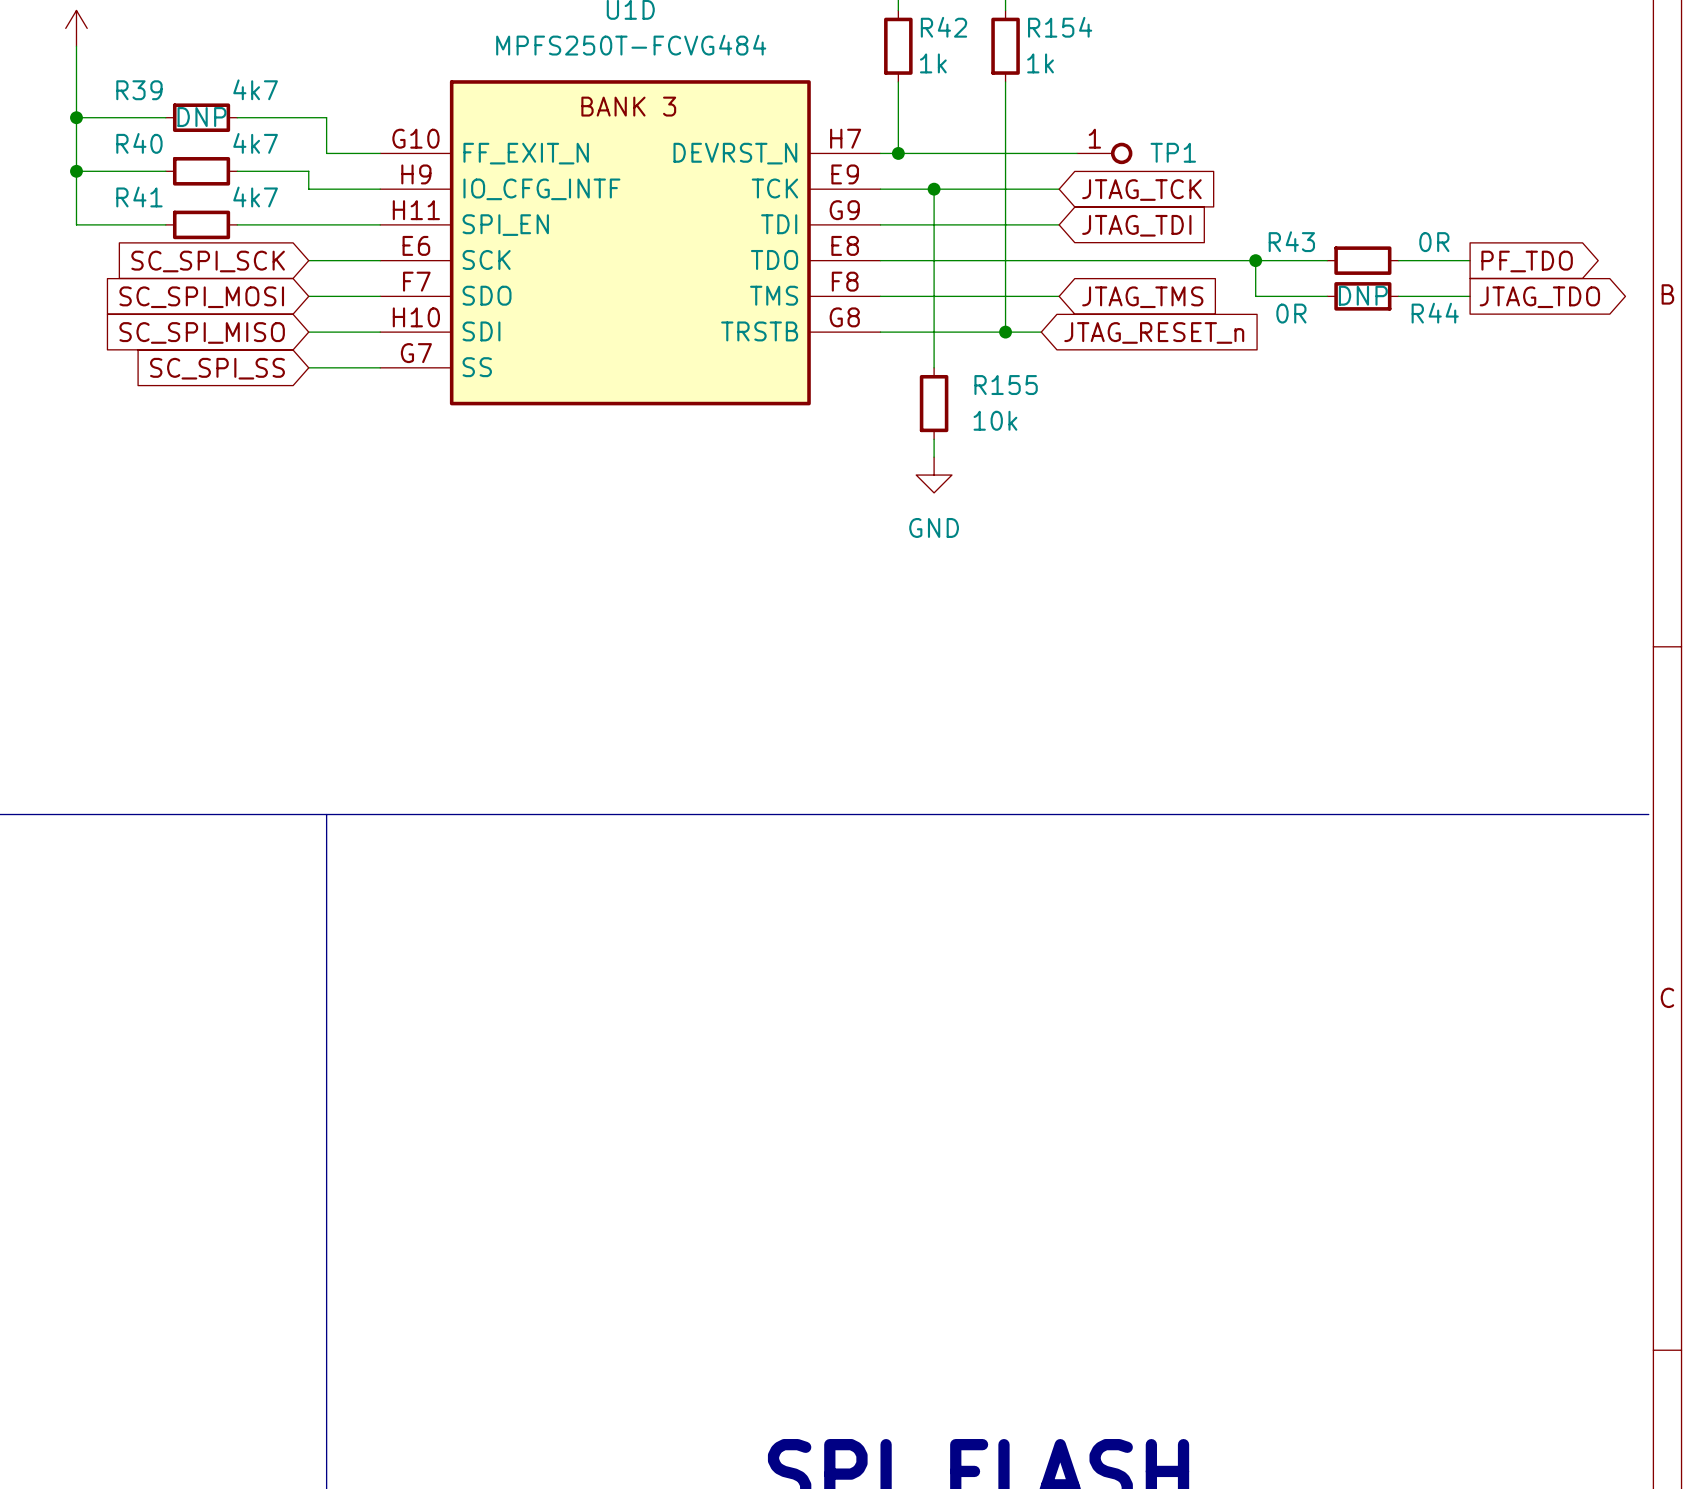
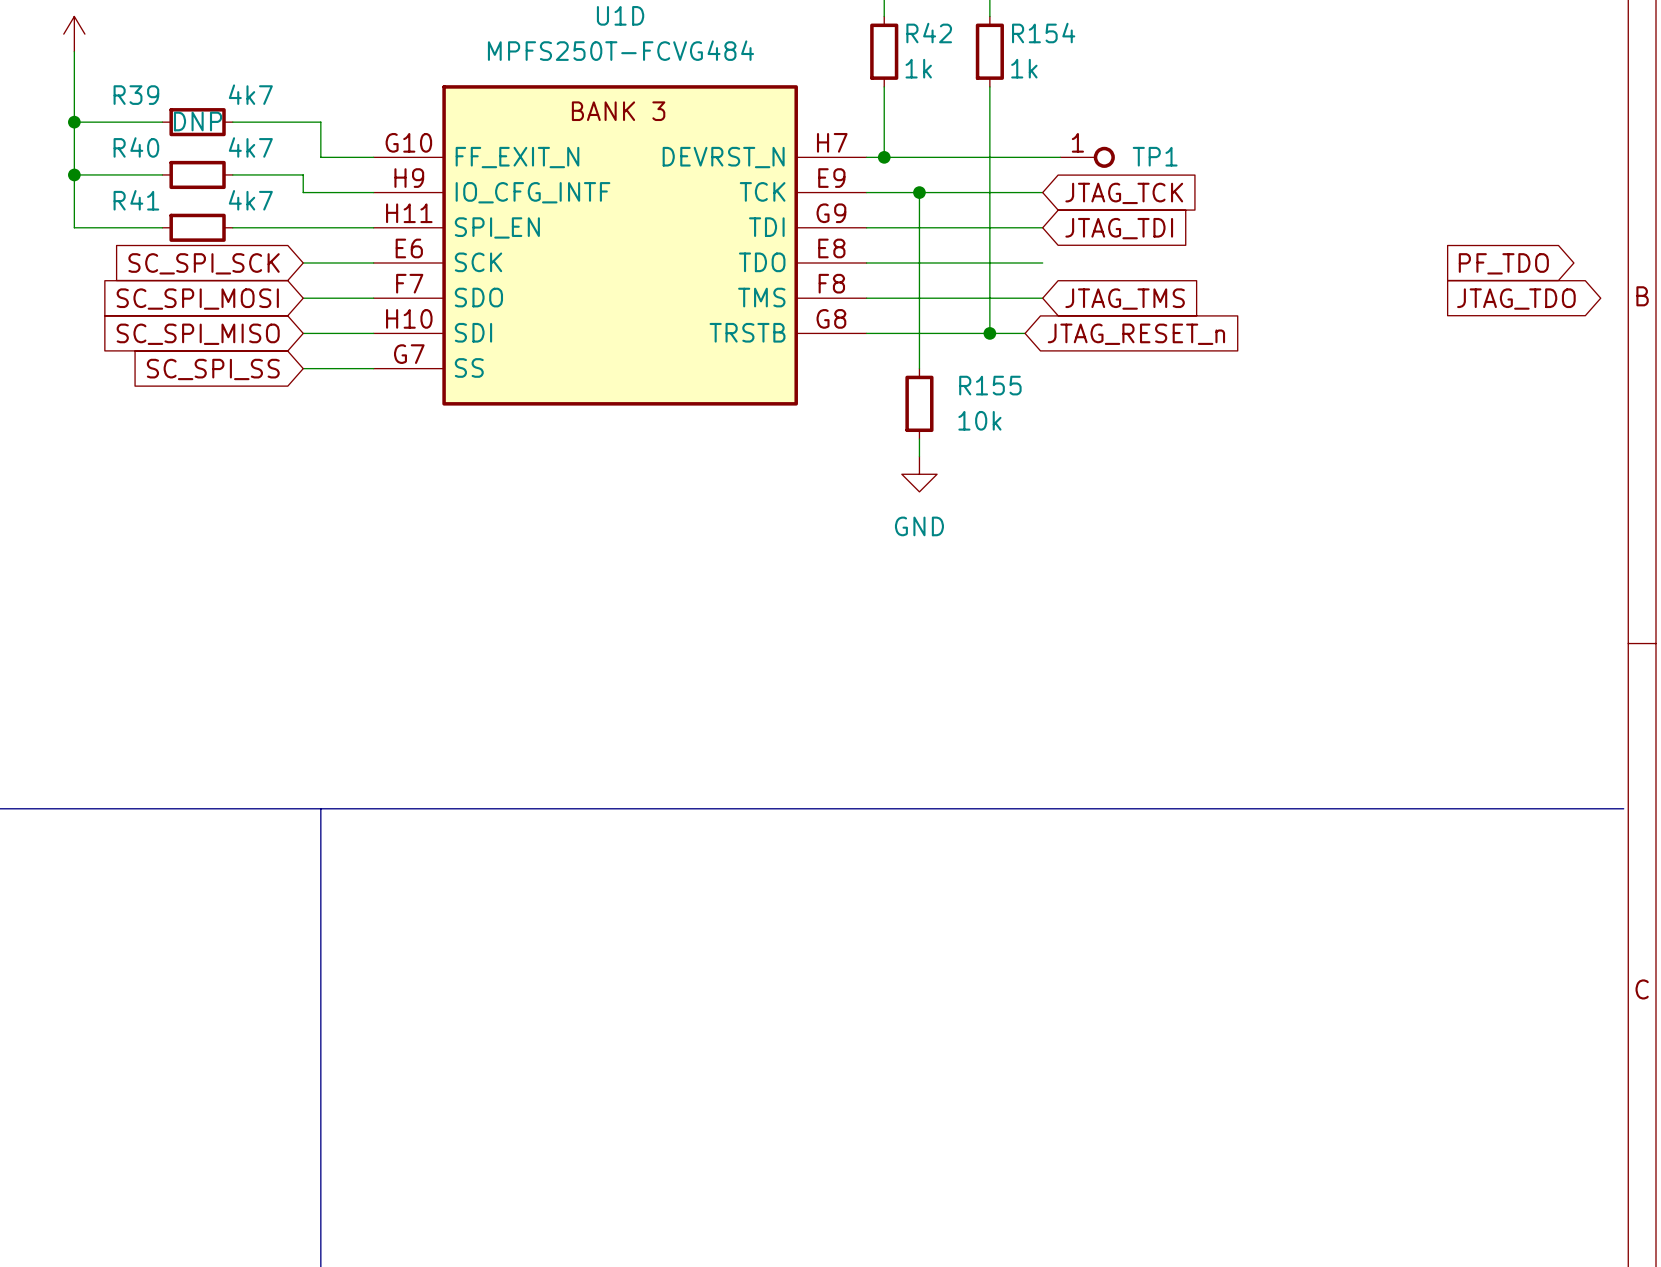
wire: (1059, 260) (1327, 260) -> none
wire: (1255, 260) (1255, 296) (1327, 296) -> none
junction: (1255, 260) -> none
R43: (1362, 260) -> none
wire: (1398, 260) (1470, 260) -> none
R44: (1362, 296) -> none
wire: (1398, 296) (1470, 296) -> none

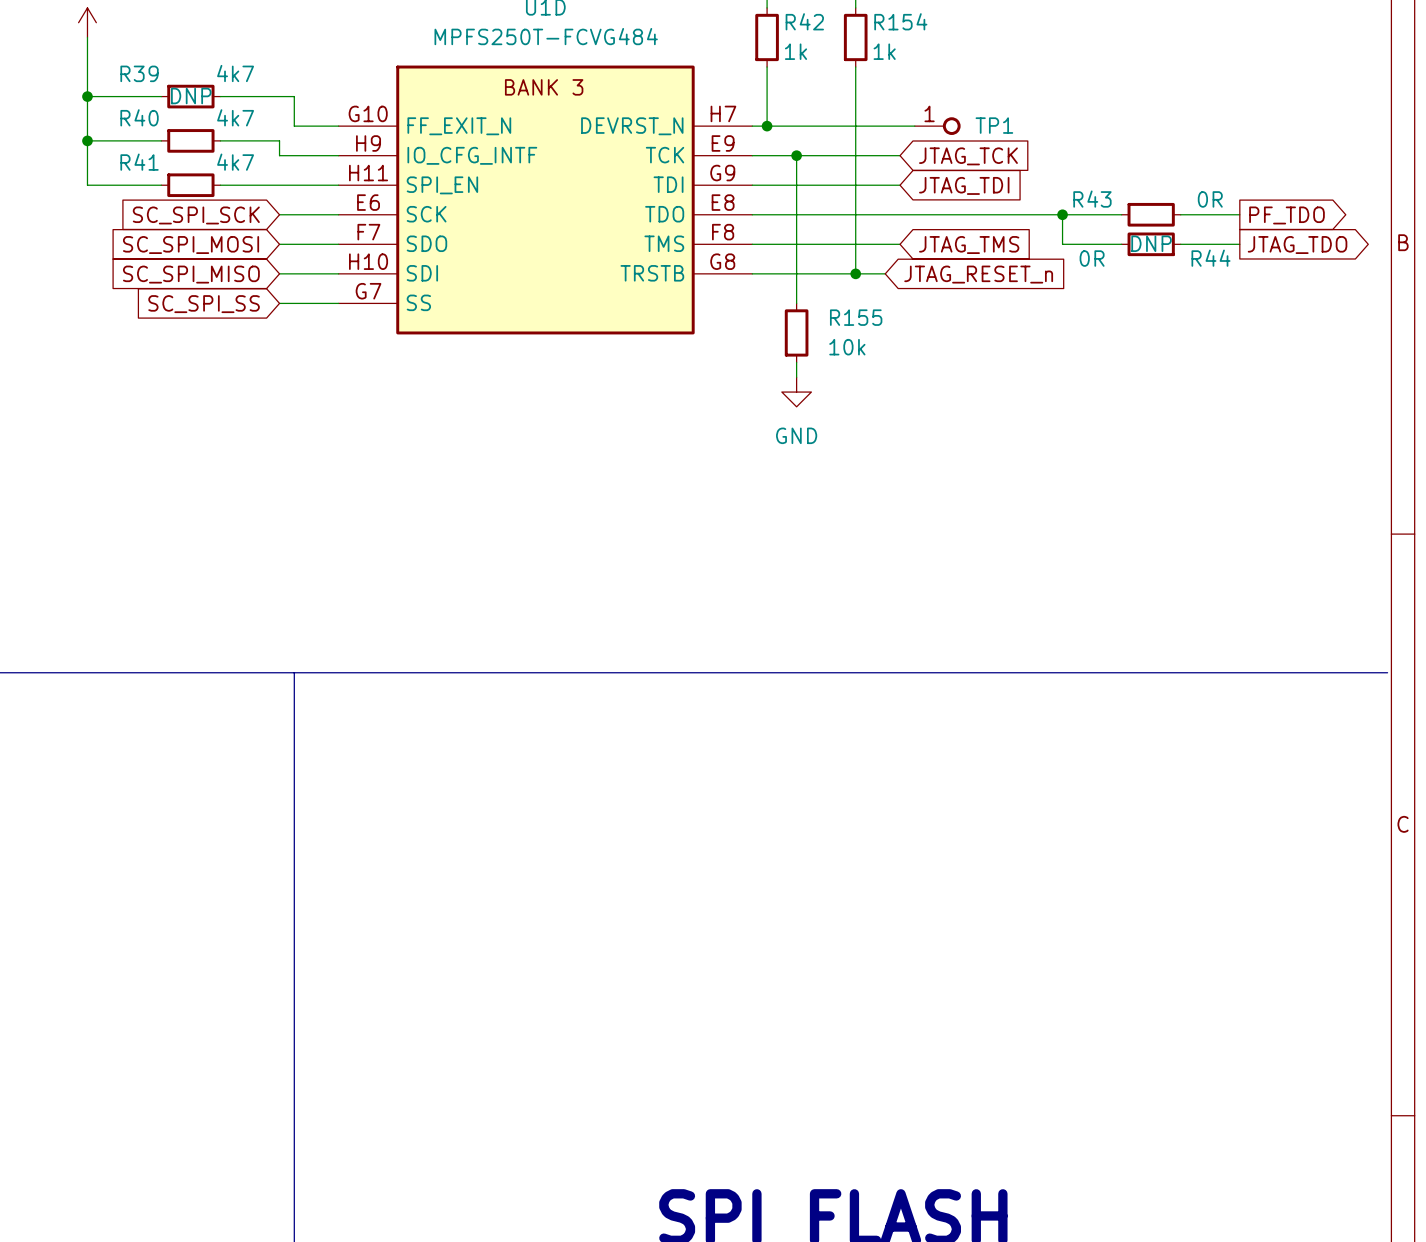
wire: none -> (900, 214) (1121, 214)
wire: none -> (1062, 214) (1062, 244) (1121, 244)
junction: none -> (1062, 214)
R43: none -> (1151, 214)
wire: none -> (1180, 214) (1239, 214)
R44: none -> (1151, 244)
wire: none -> (1180, 244) (1239, 244)

